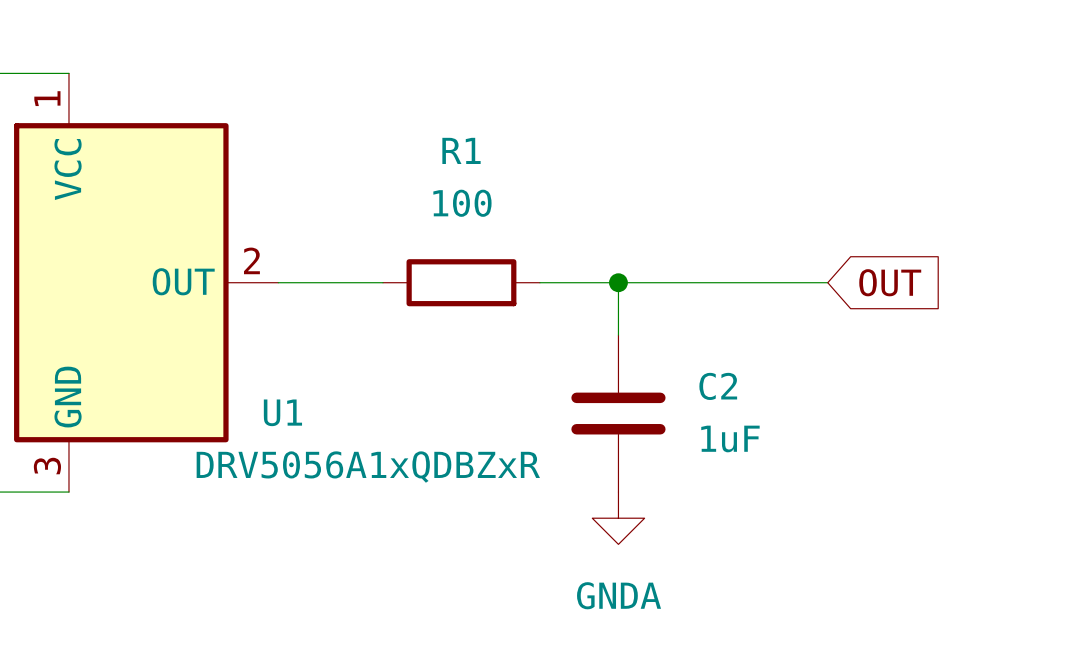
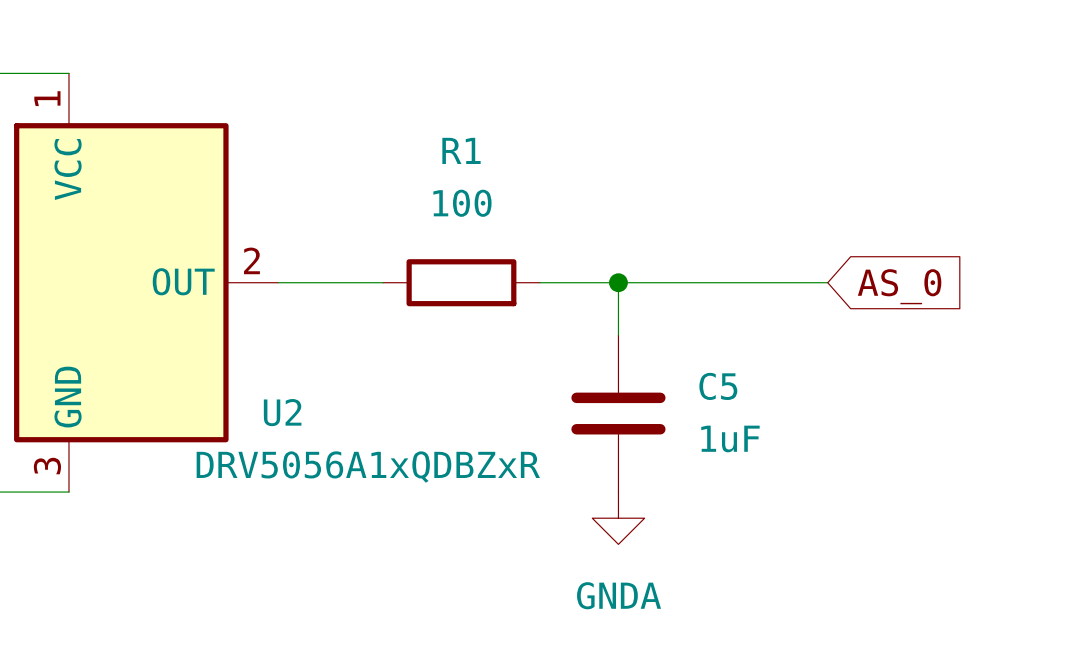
global label: OUT (890, 282) -> AS_0 (899, 286)
C2 name: C2 (718, 386) -> C5 (718, 386)
U1 name: U1 (282, 412) -> U2 (282, 412)

